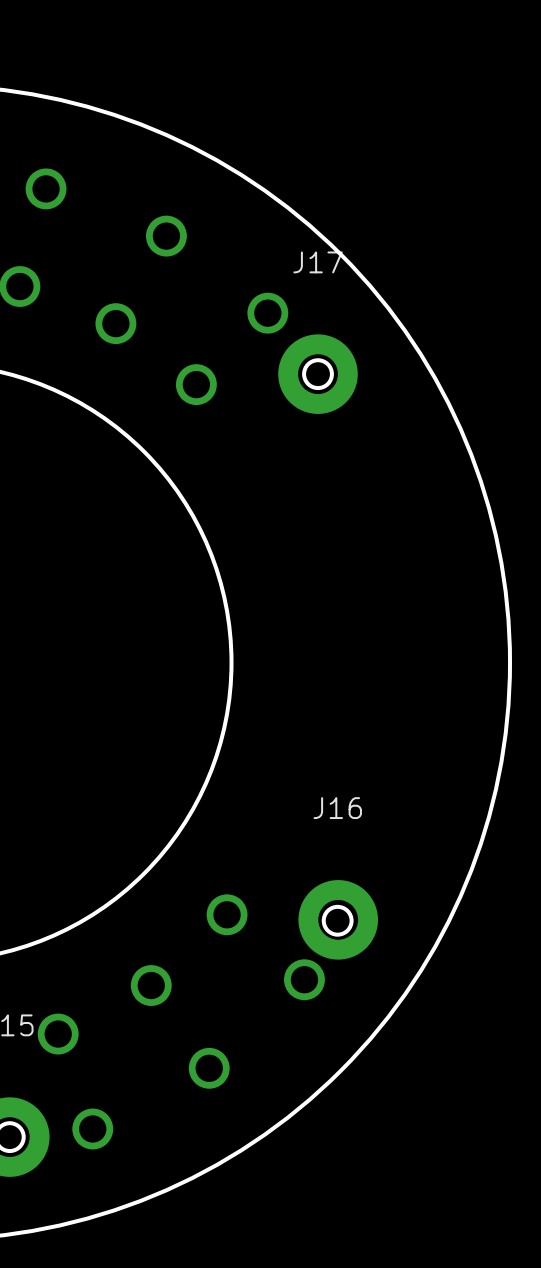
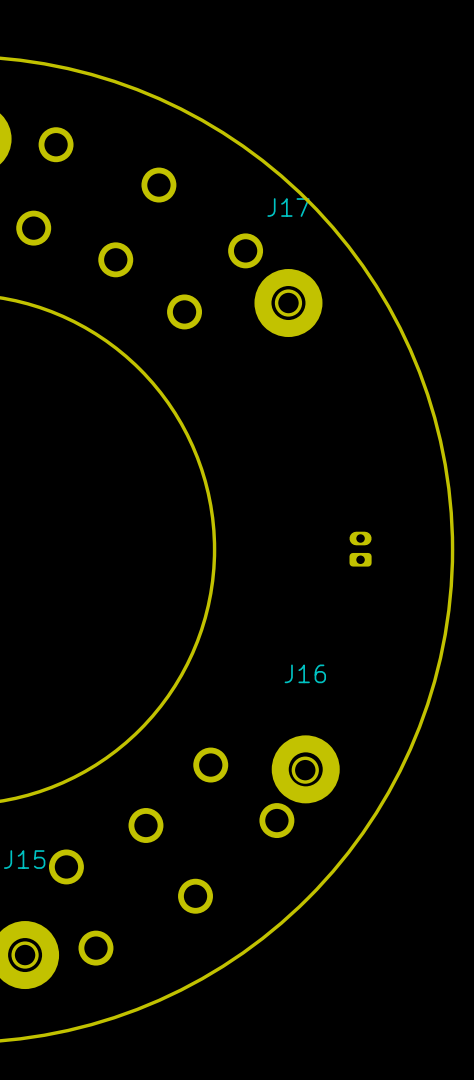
part: none -> (360, 549)

